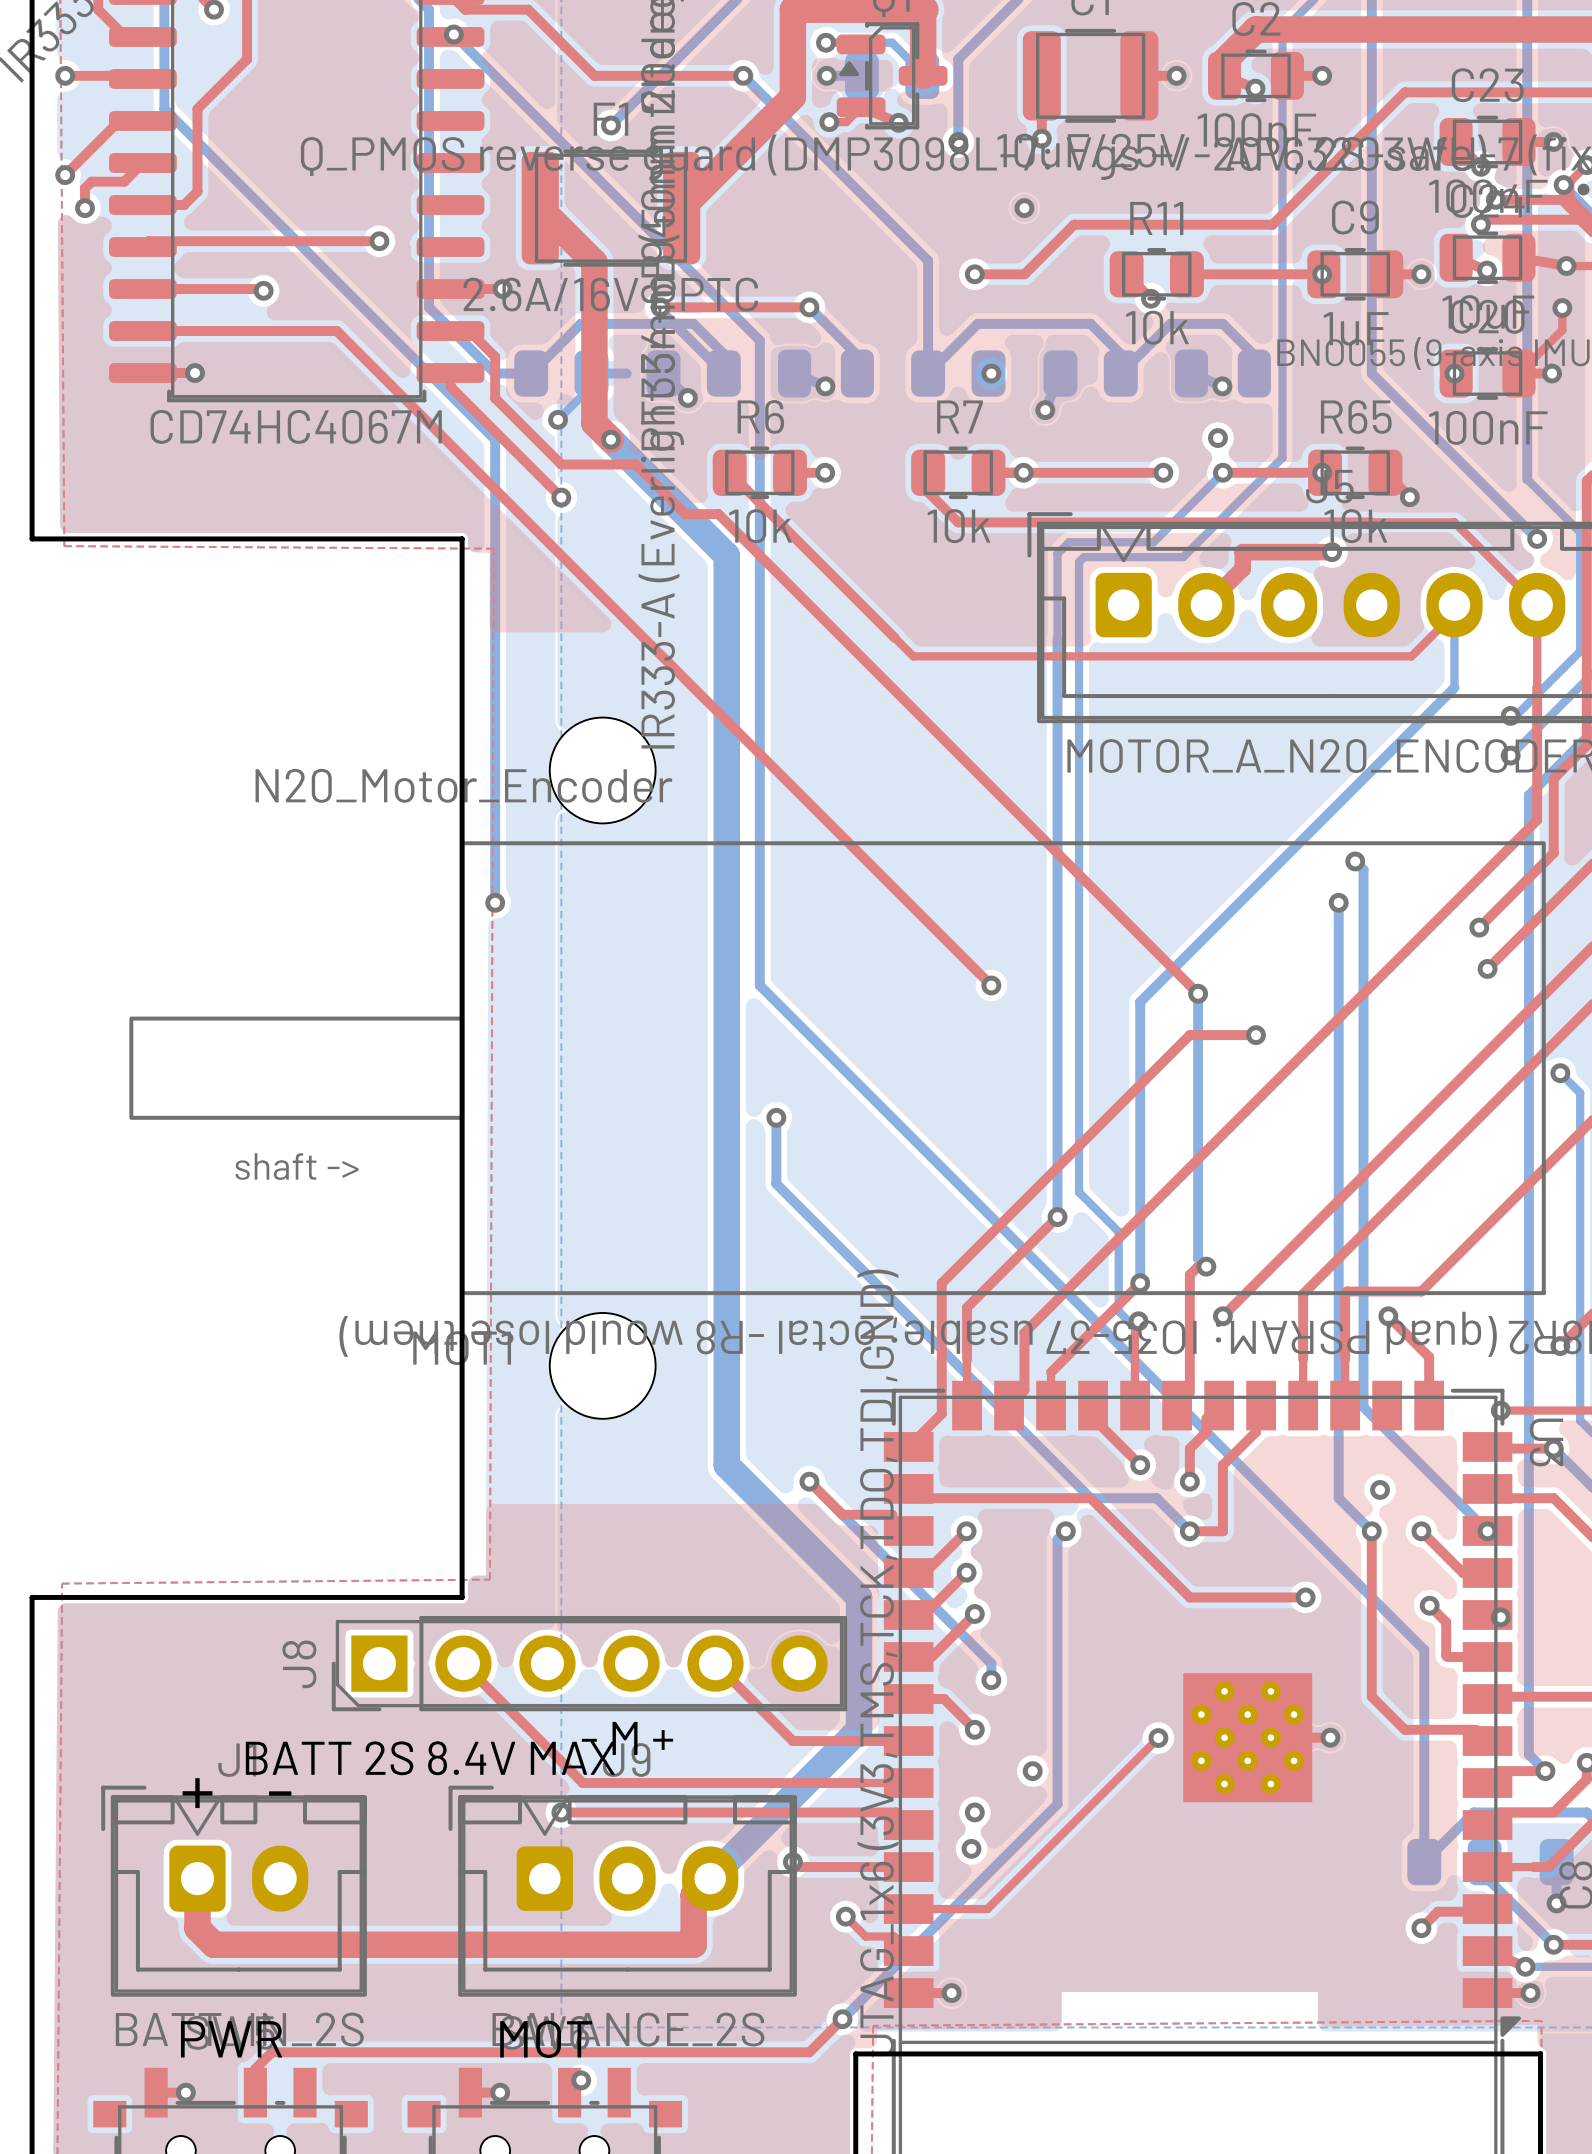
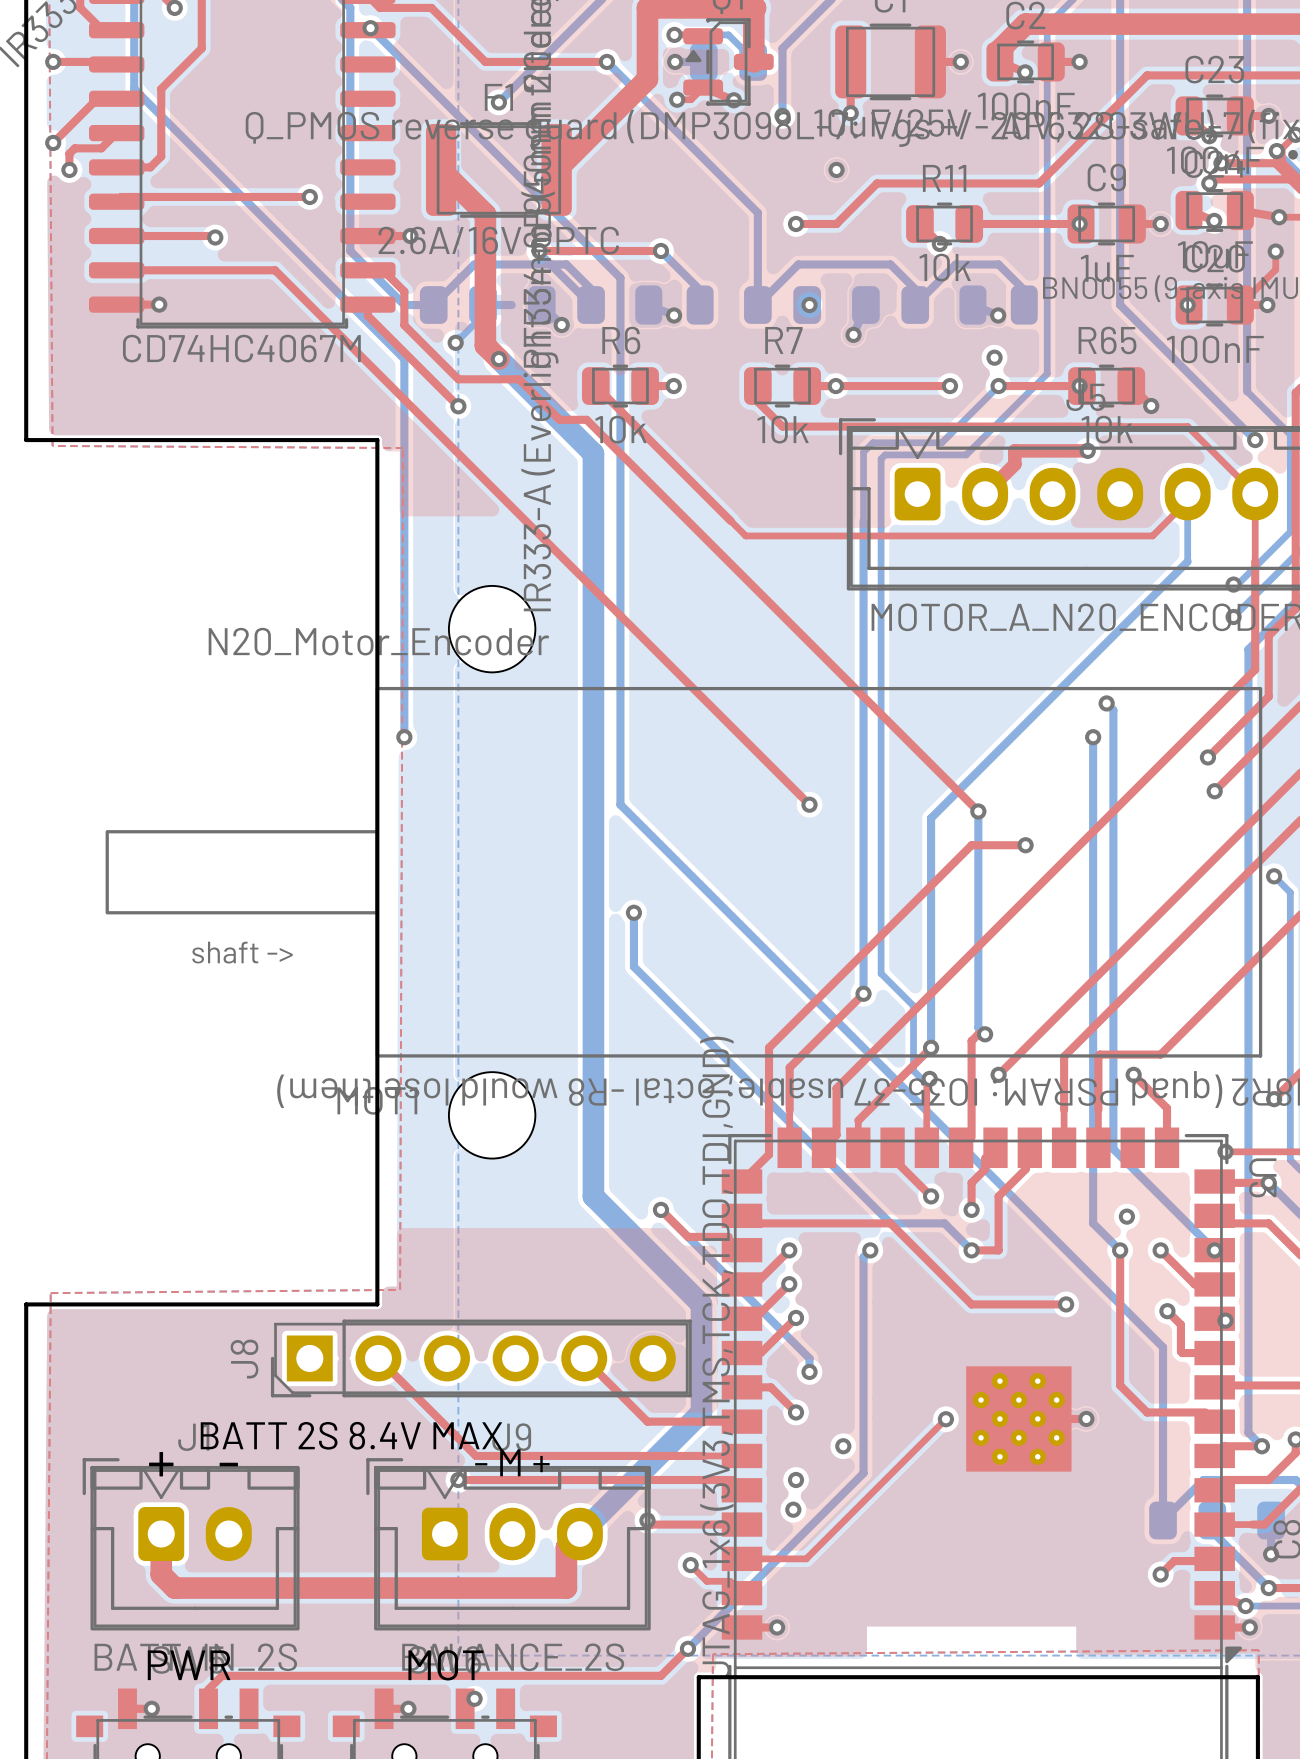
text position: - M + (627, 1738) -> - M + (512, 1462)

